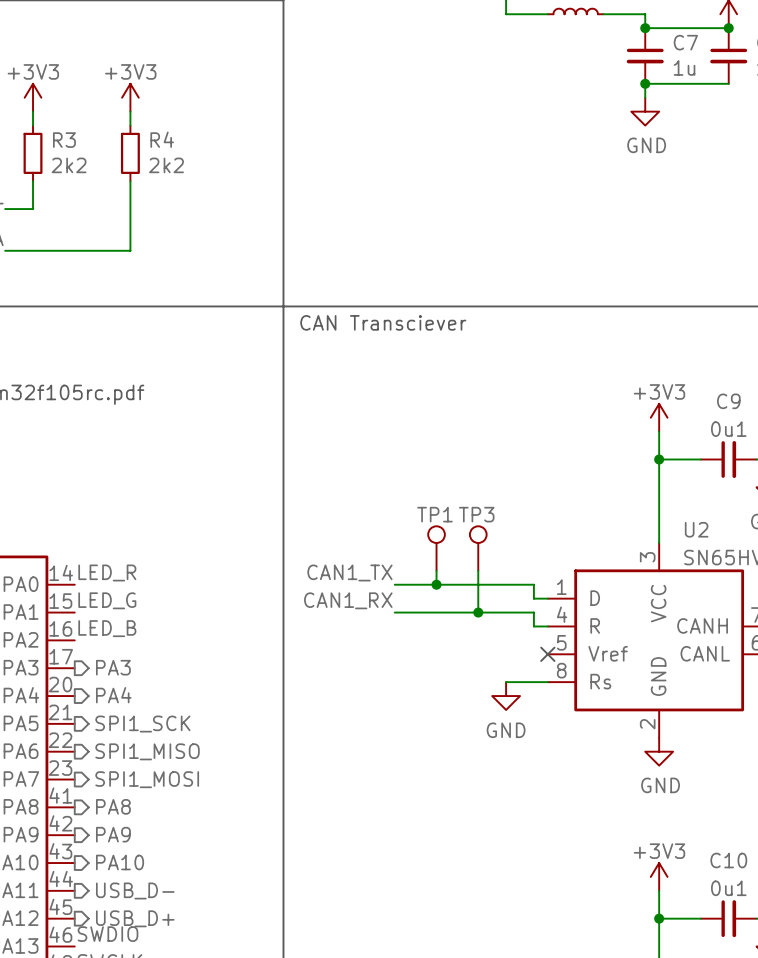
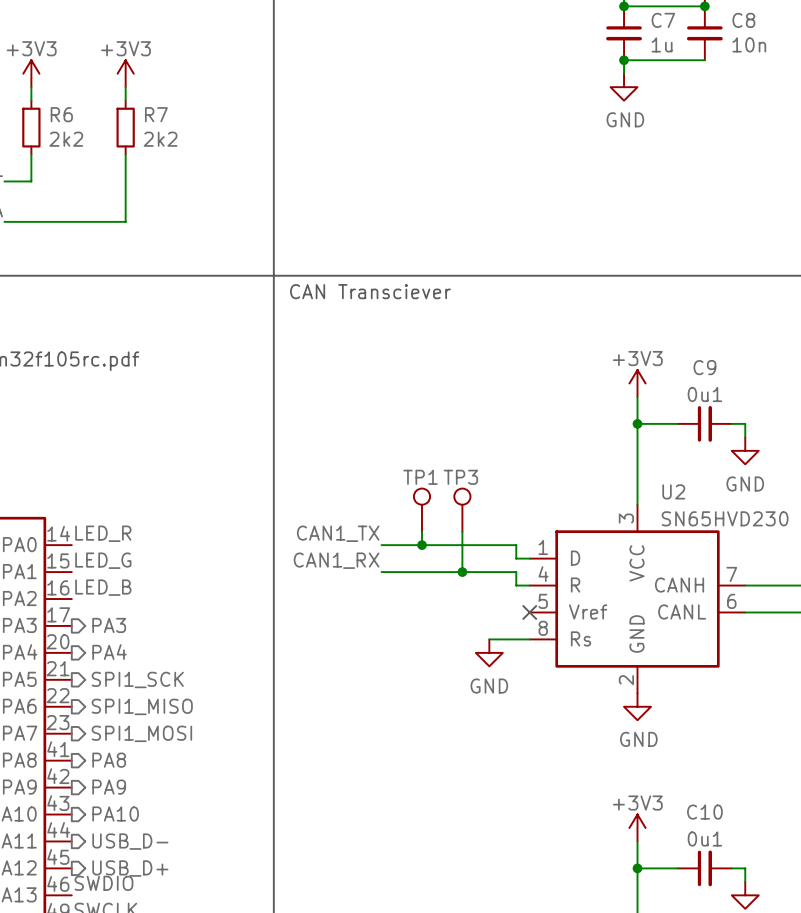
R4 name: R4 (162, 139) -> R7 (156, 114)
R3 name: R3 (64, 140) -> R6 (61, 114)

